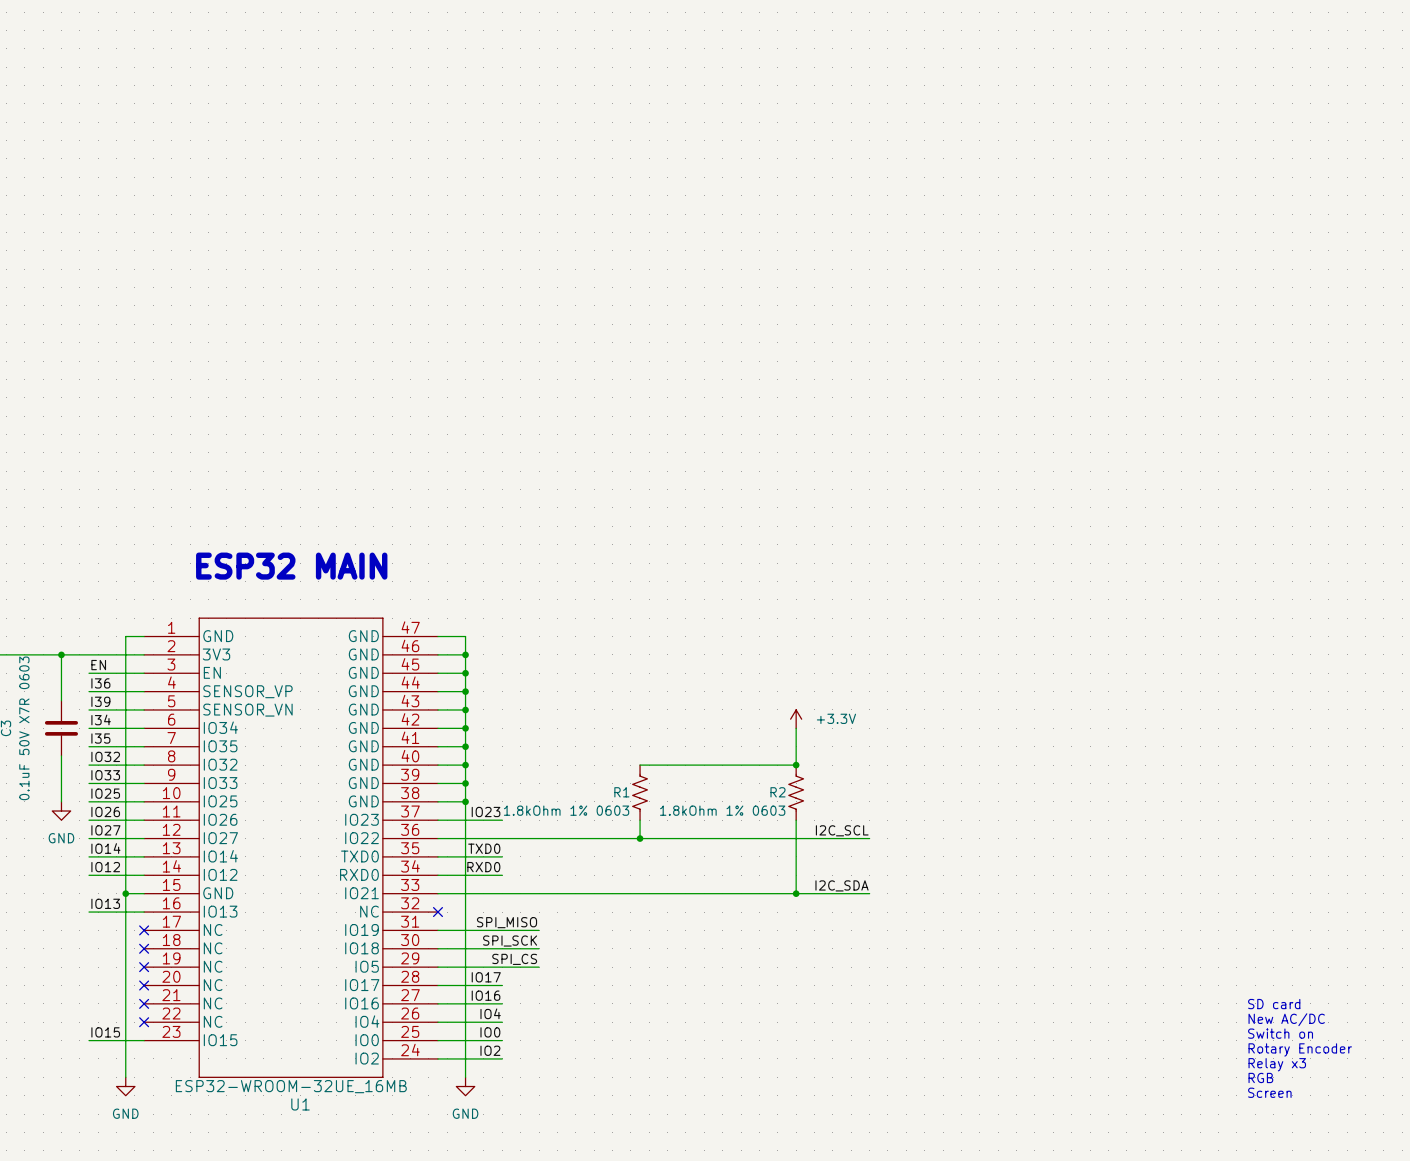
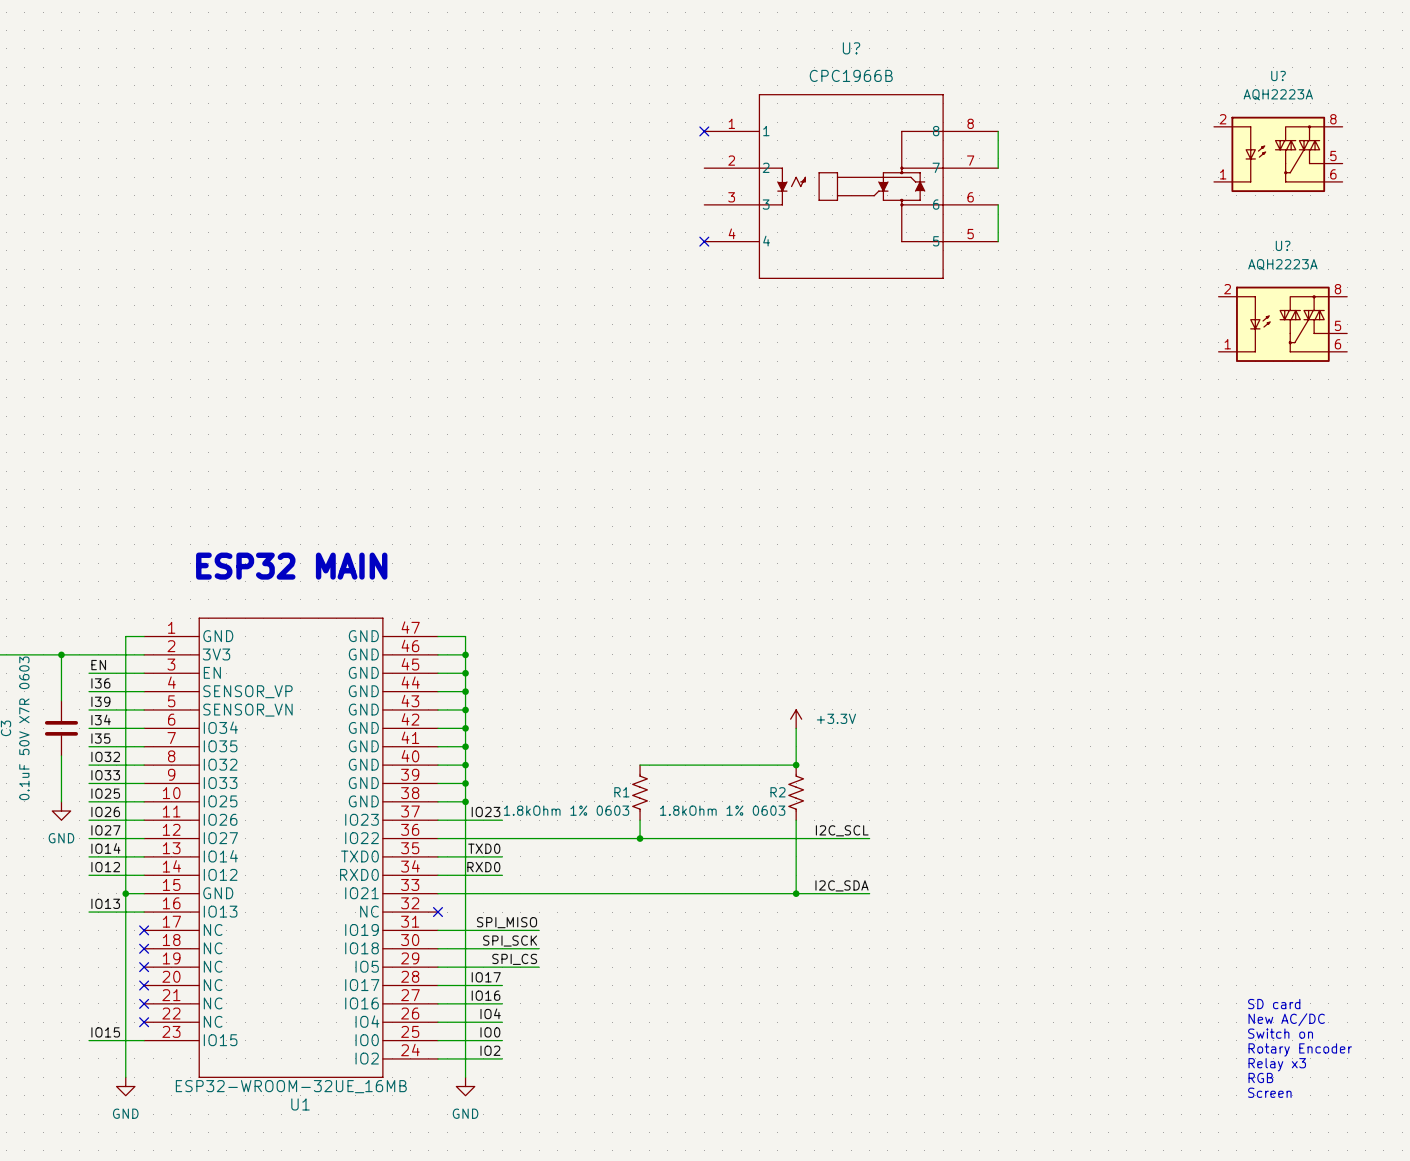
no-connect mark: none -> (704, 131)
wire: none -> (998, 131) (998, 168)
U?: none -> AQH2223A (1278, 154)
U?: none -> CPC1966B (851, 186)
wire: none -> (998, 204) (998, 241)
no-connect mark: none -> (704, 241)
U?: none -> AQH2223A (1282, 324)

